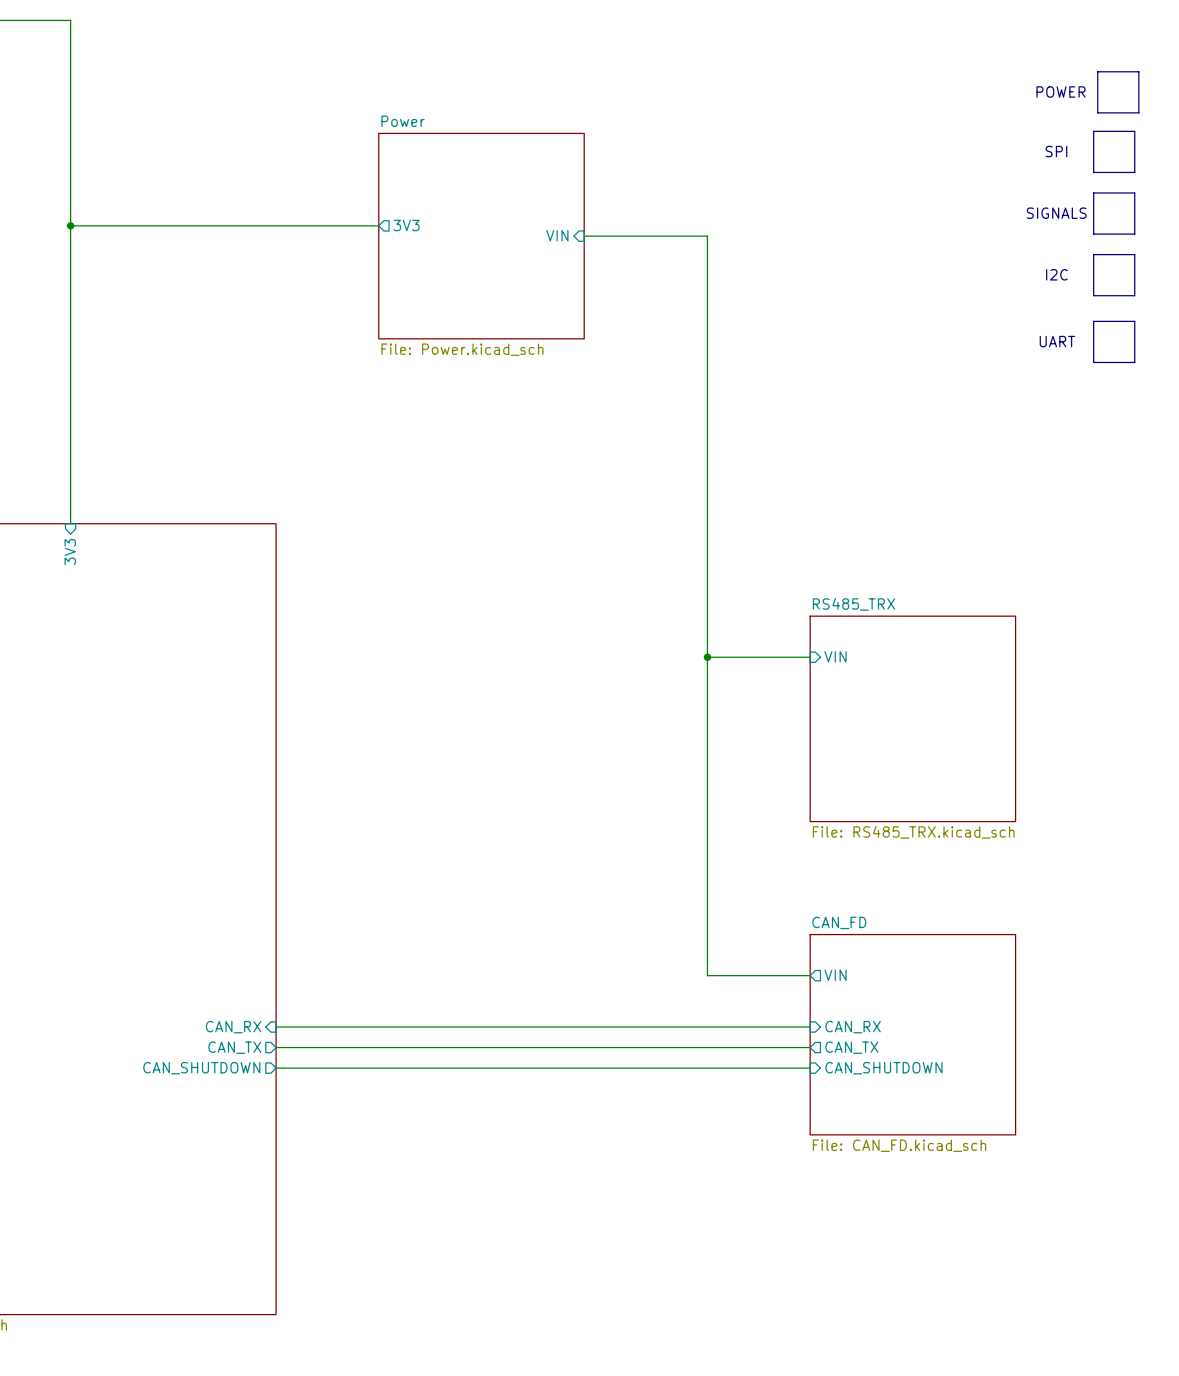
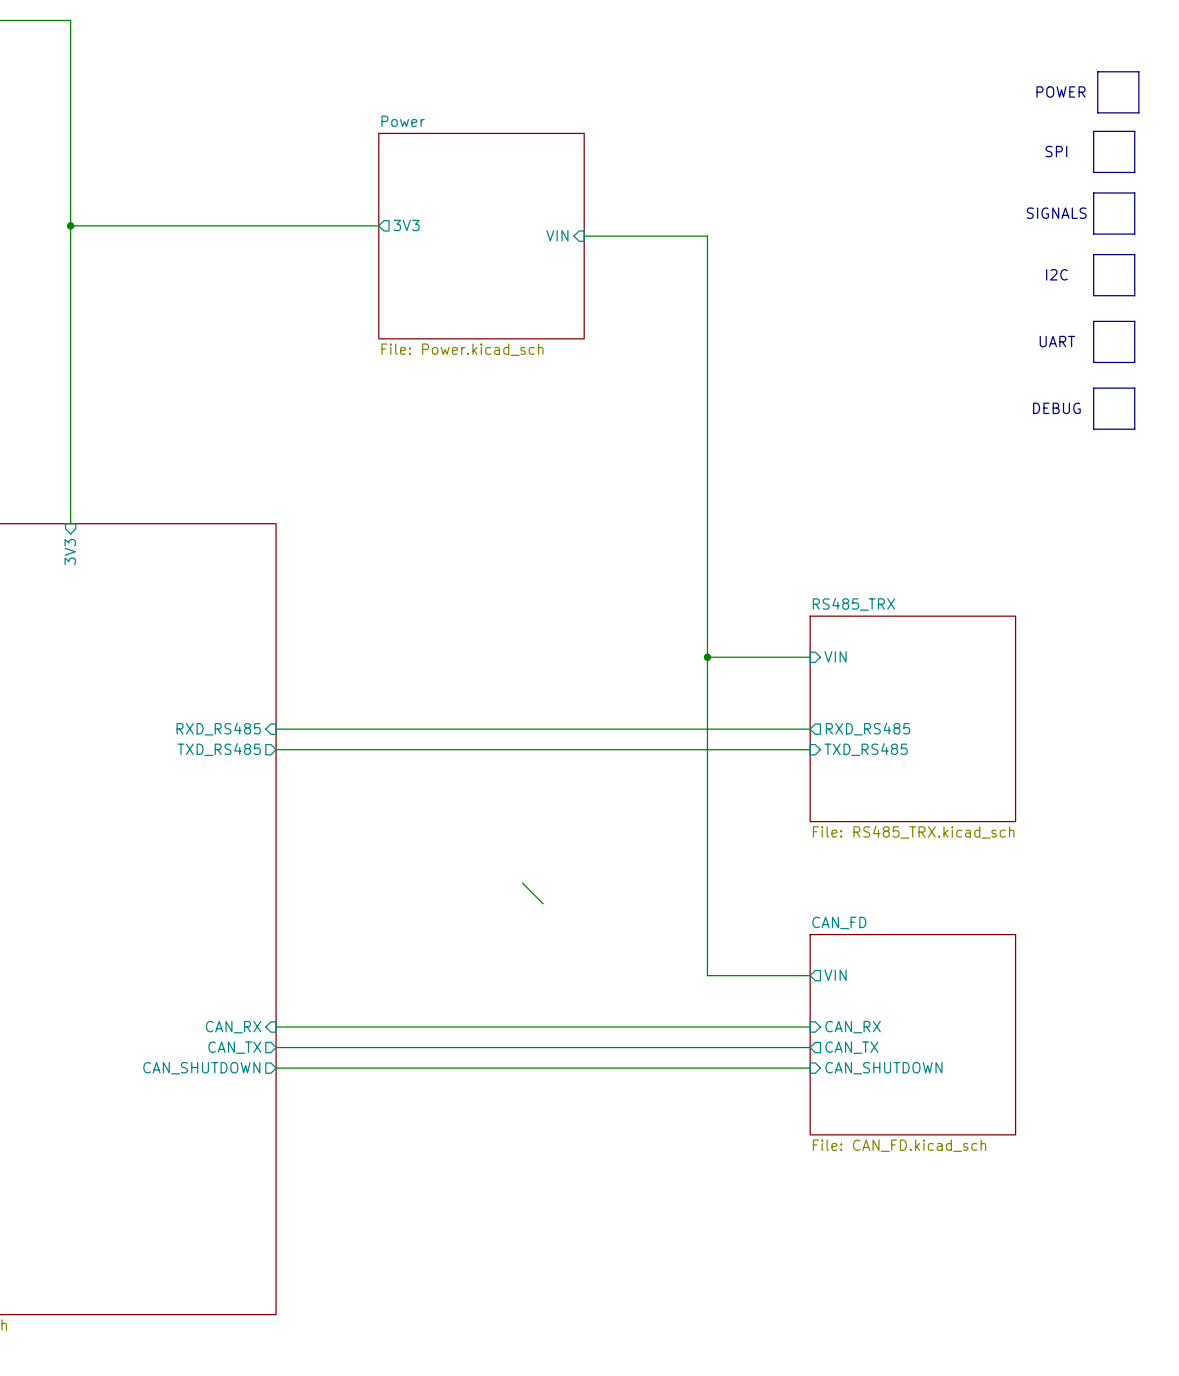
line: none -> (1093, 388) (1134, 388) (1134, 429) (1093, 429) (1093, 388)
text: none -> DEBUG (1056, 408)
sheet pin: none -> RXD_RS485 (218, 729)
wire: none -> (276, 729) (810, 729)
sheet pin: none -> RXD_RS485 (868, 729)
sheet pin: none -> TXD_RS485 (219, 749)
wire: none -> (276, 749) (810, 749)
sheet pin: none -> TXD_RS485 (866, 749)
wire: none -> (522, 883) (543, 903)

